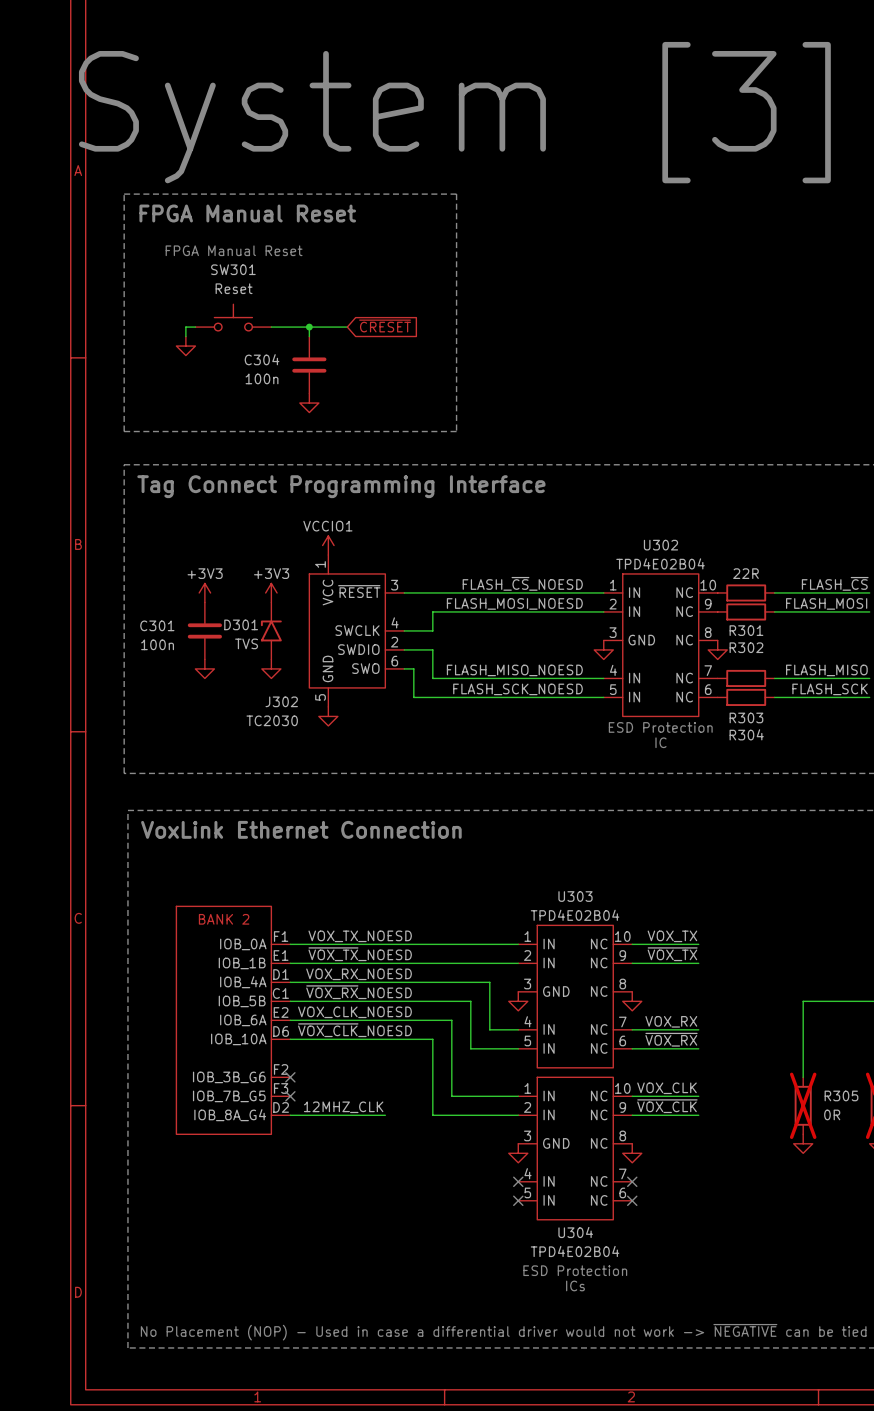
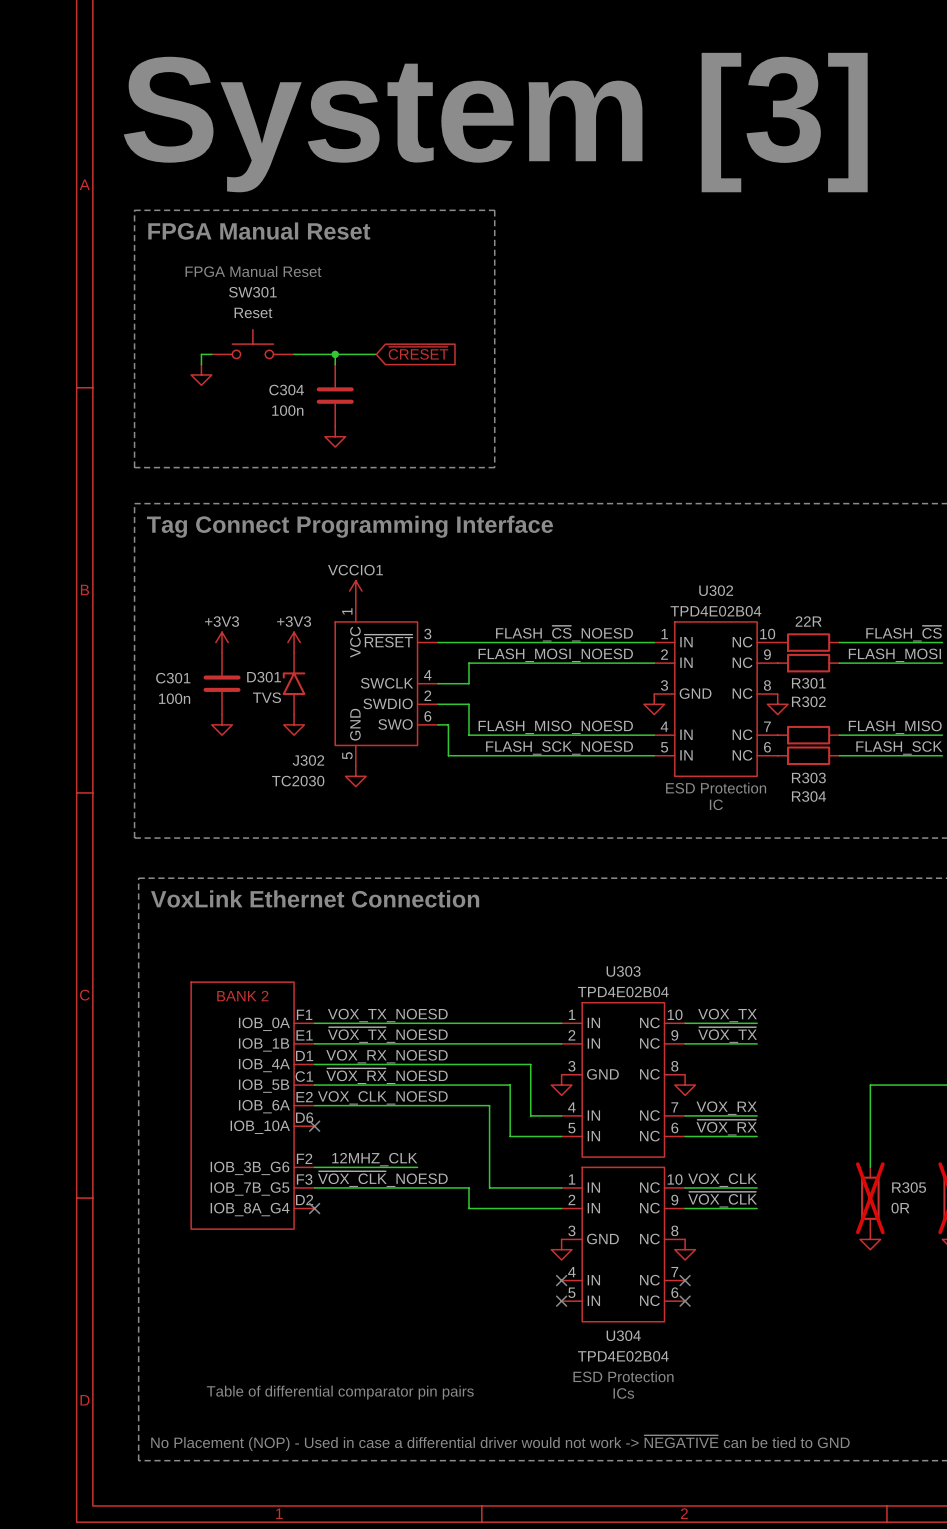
label position: ~{VOX_CLK}_NOESD (354, 1030) -> ~{VOX_CLK}_NOESD (382, 1179)
wire: (290, 1039) (432, 1039) (432, 1096) -> (314, 1187) (469, 1187)
no-connect mark: none -> (314, 1126)
no-connect mark: (290, 1077) -> none
no-connect mark: (290, 1096) -> none
label position: 12MHZ_CLK (343, 1107) -> 12MHZ_CLK (374, 1159)
wire: (290, 1115) (385, 1115) -> (314, 1167) (417, 1167)
no-connect mark: none -> (314, 1208)
text: none -> Table of differential comparator pin pairs (340, 1392)

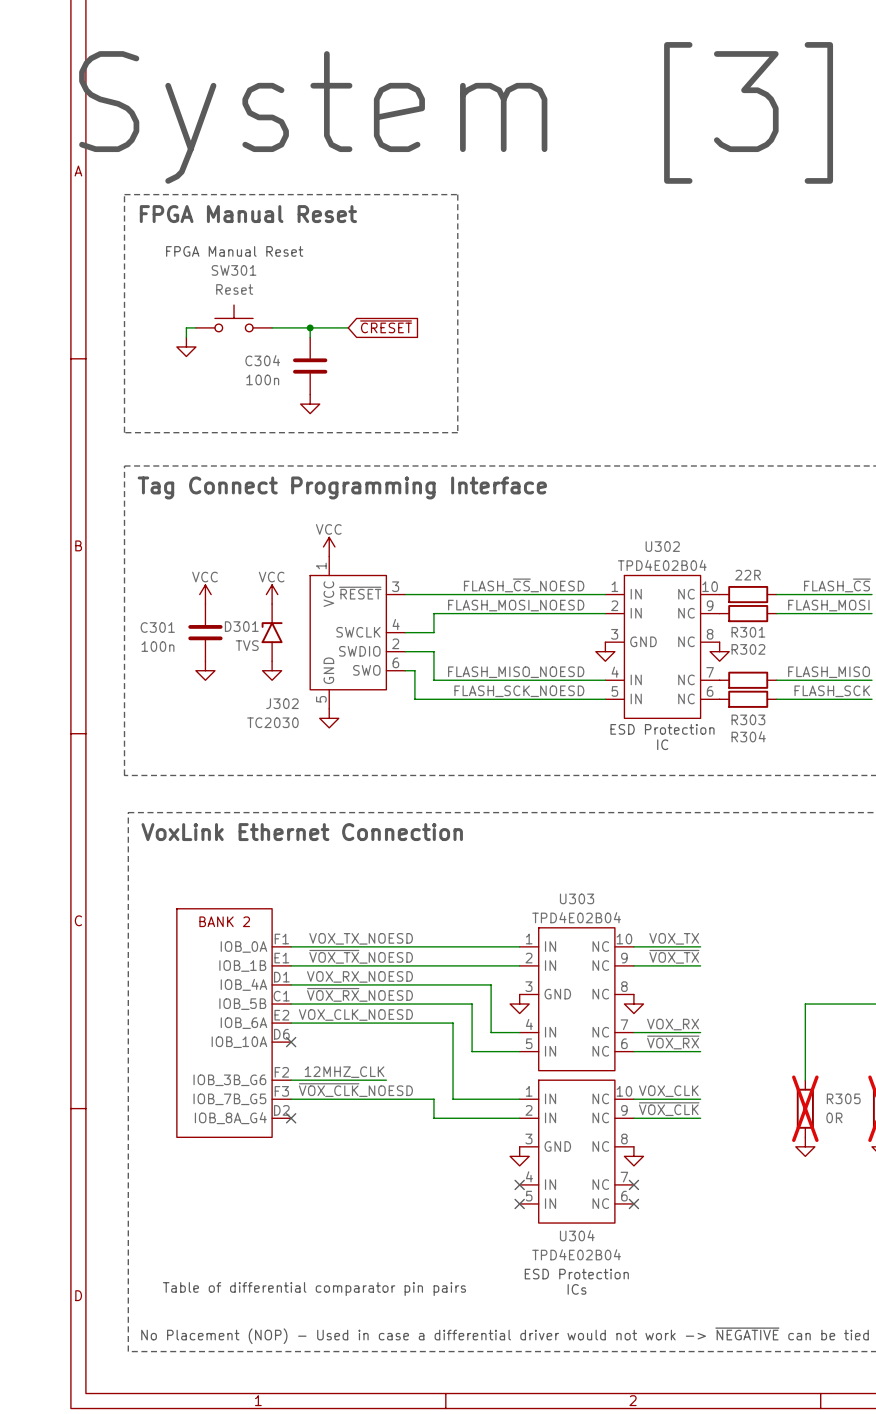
power symbol: VCCIO1 (355, 591) -> VCC (329, 546)
power symbol: +3V3 (222, 642) -> VCC (205, 594)
power symbol: +3V3 (294, 642) -> VCC (272, 594)

